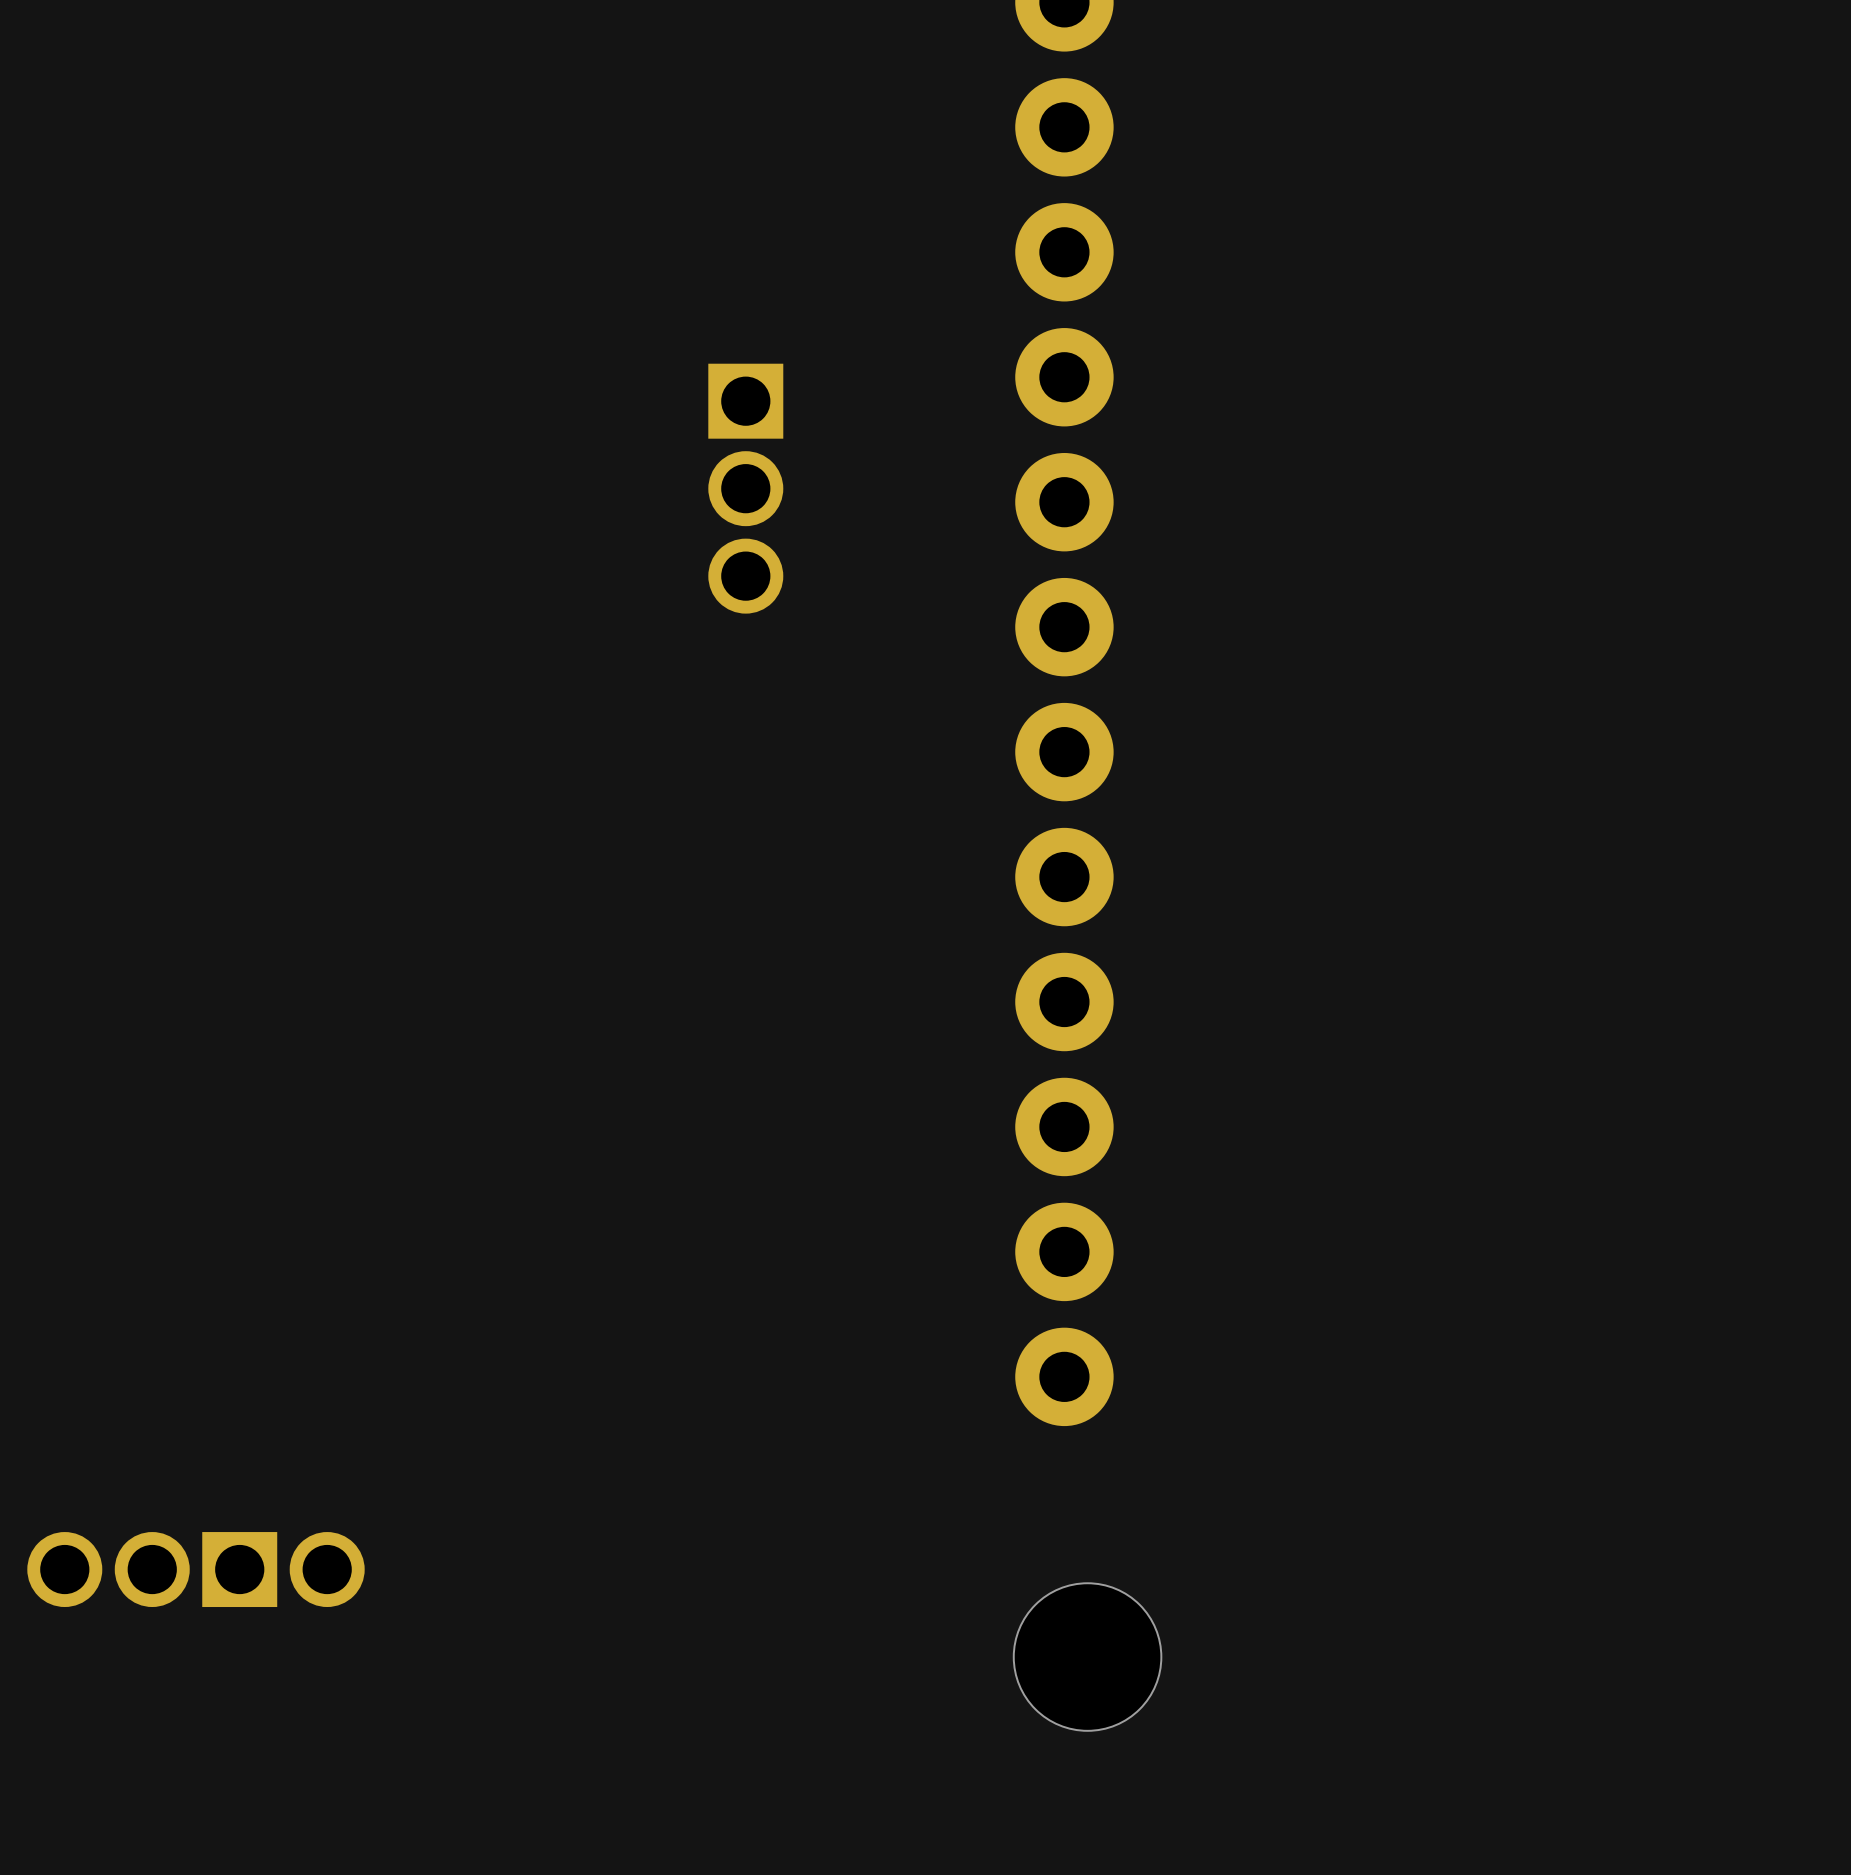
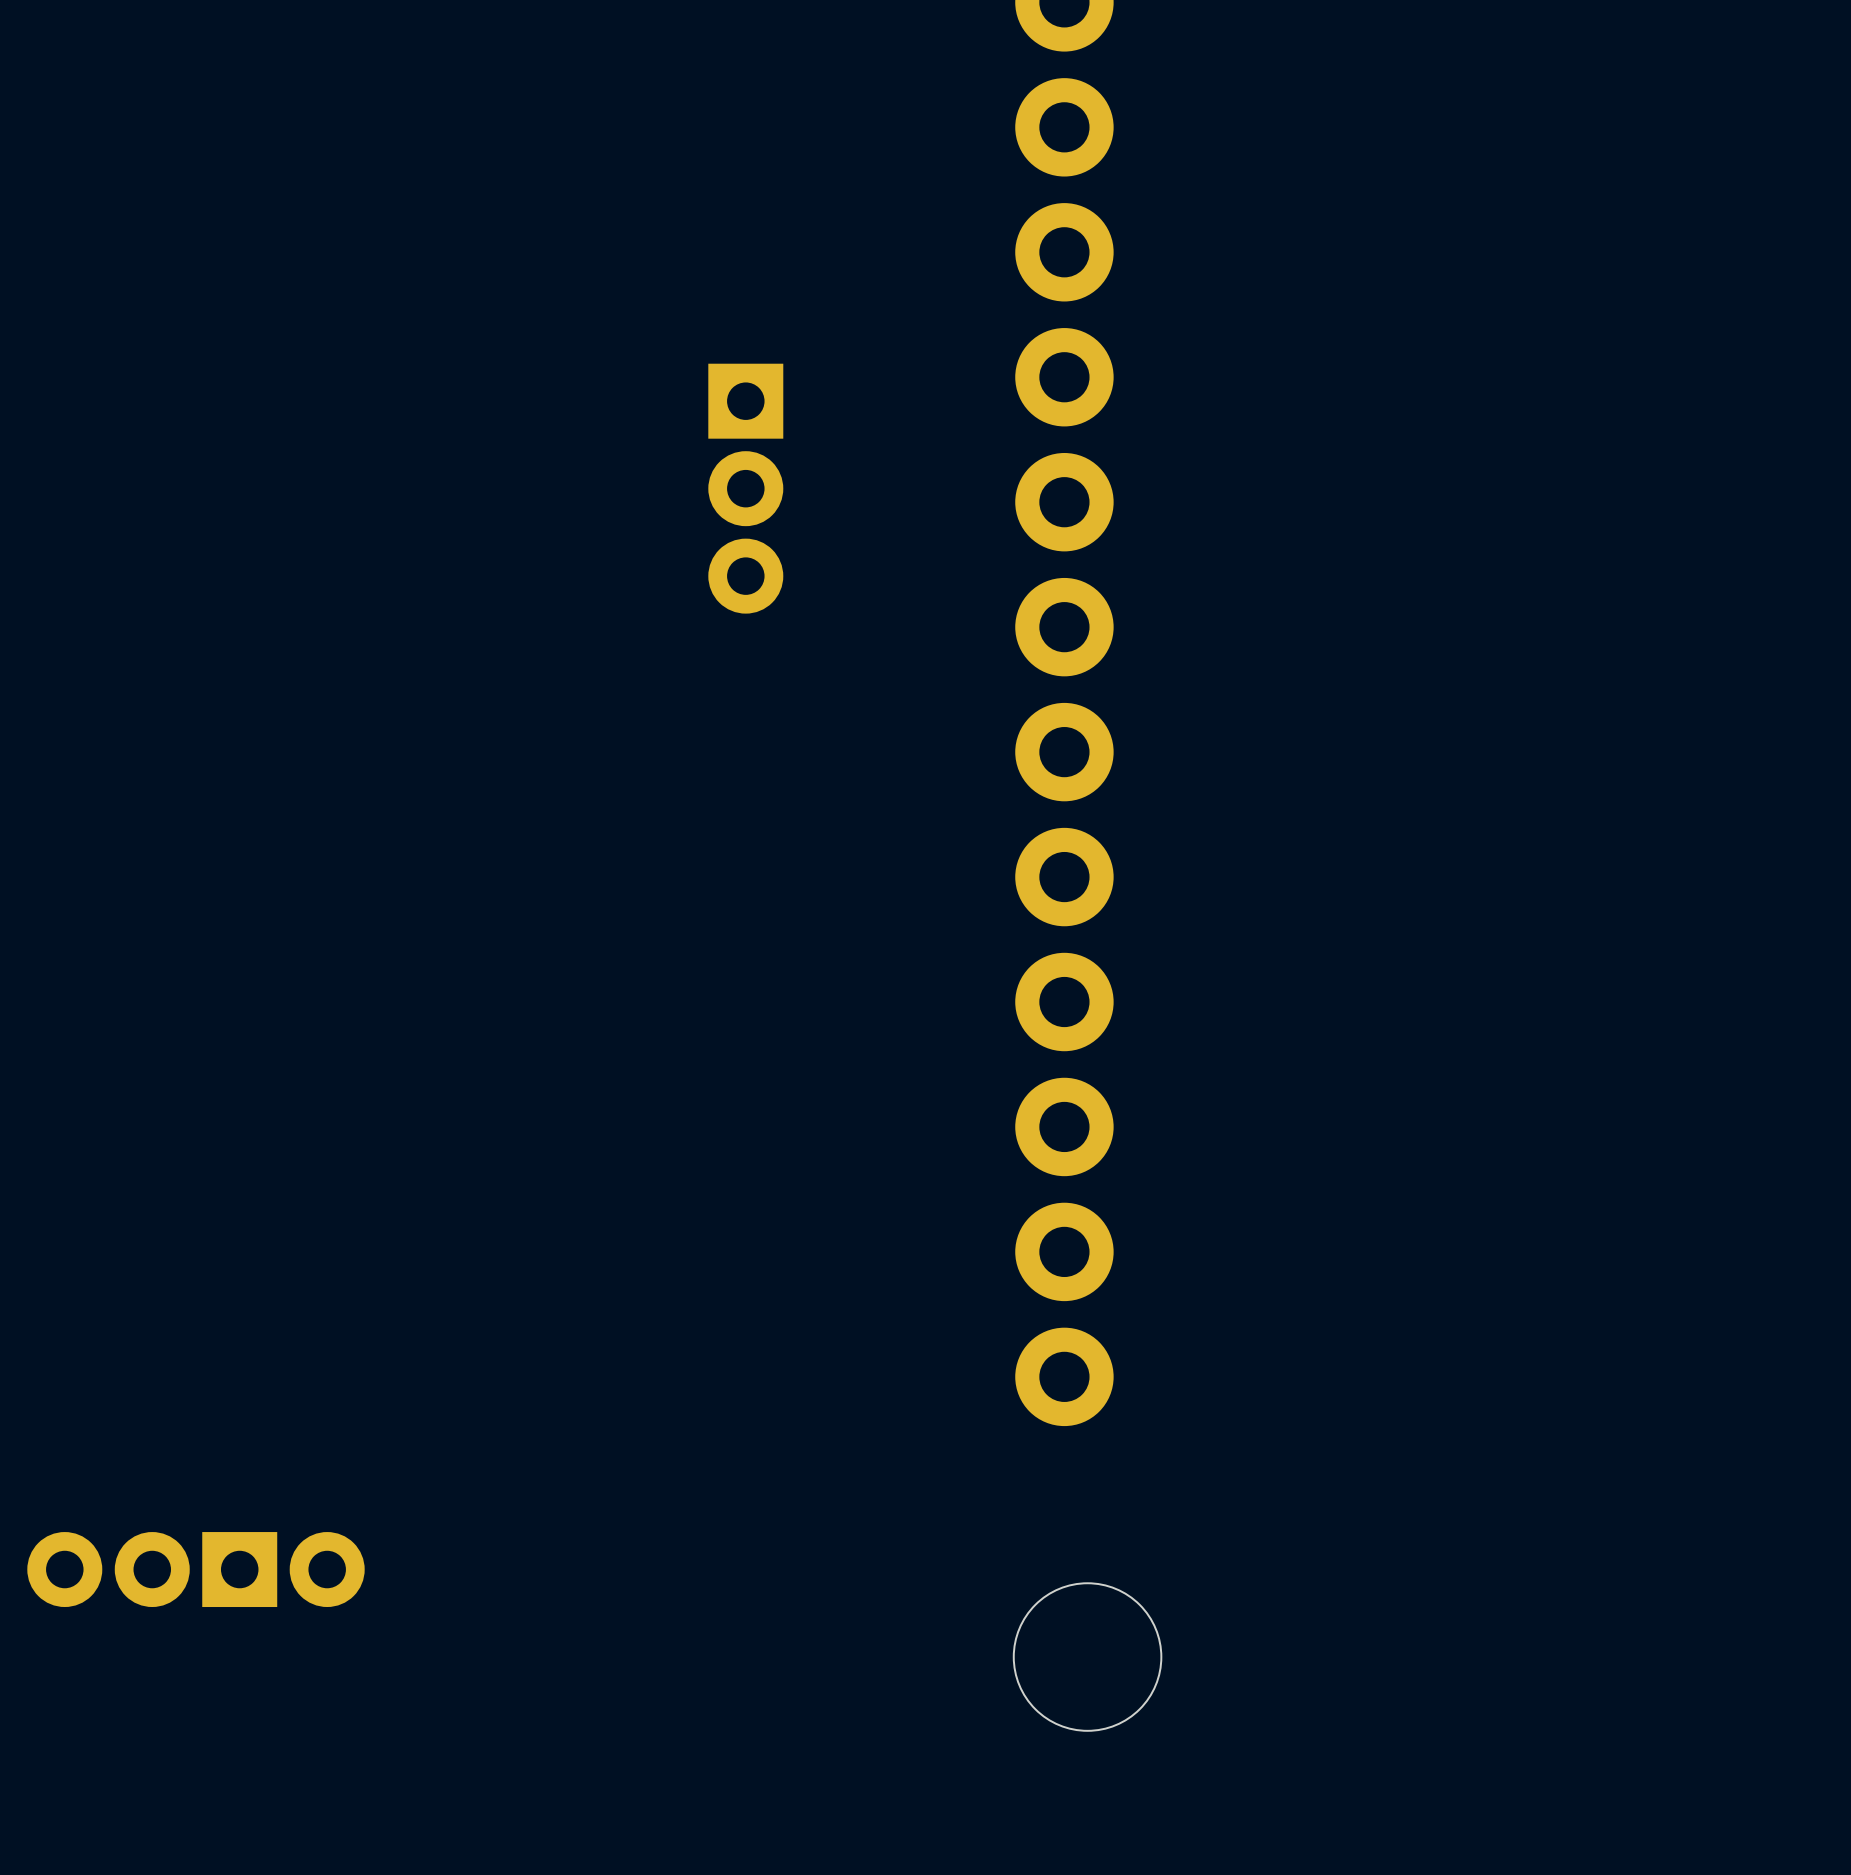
part footprint: [708, 363, 784, 614] -> [708, 363, 784, 614]
part footprint: [27, 1532, 365, 1608] -> [27, 1532, 365, 1608]

